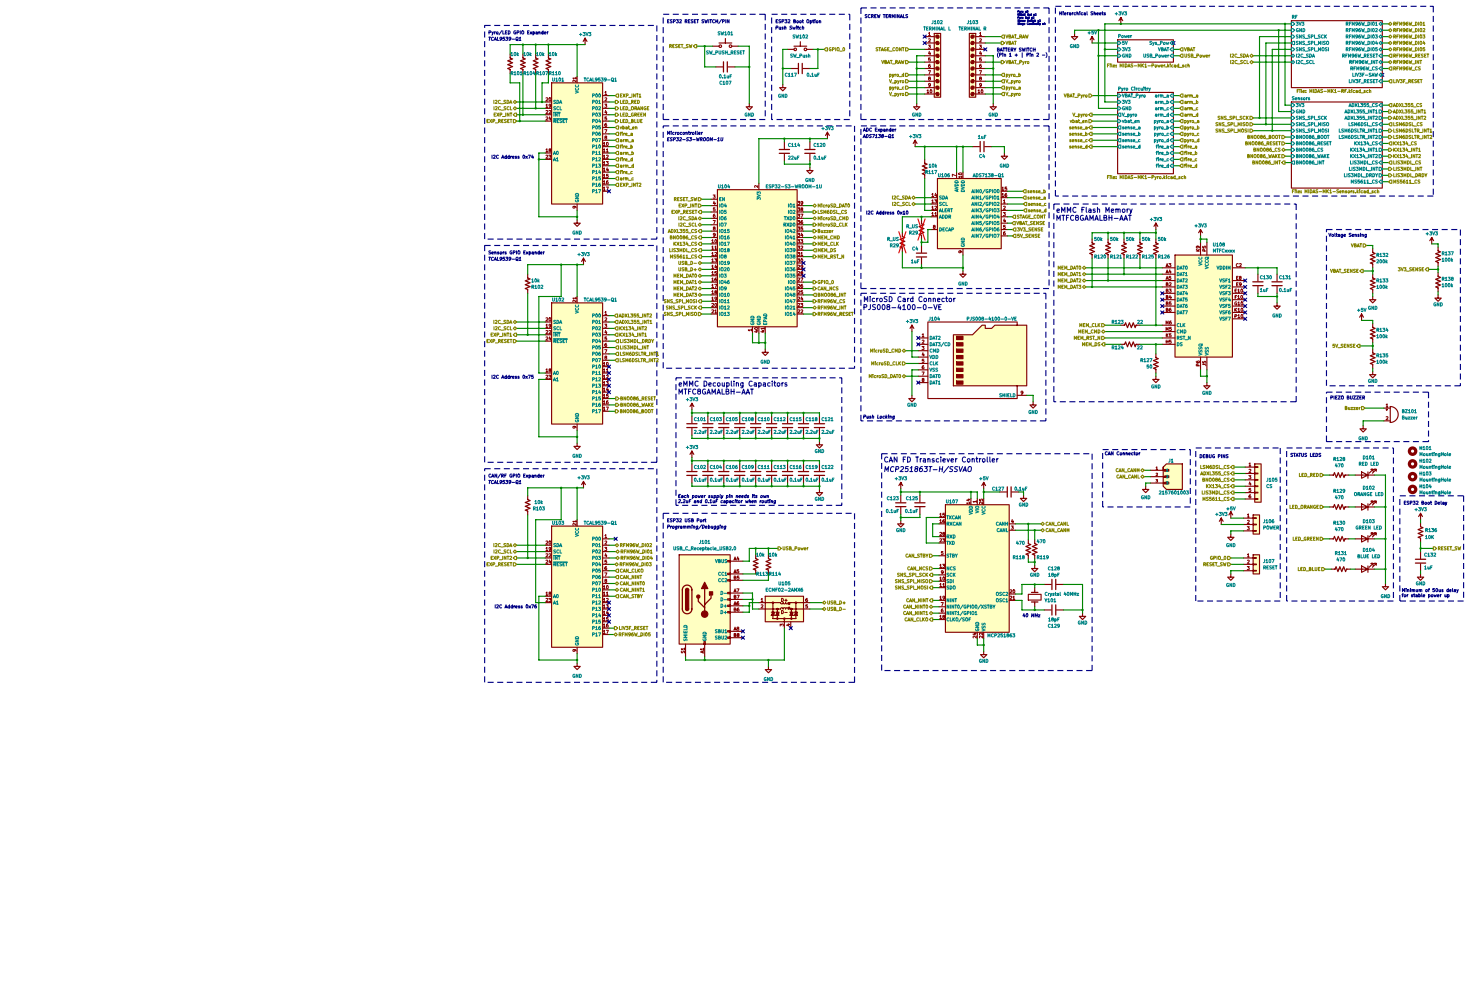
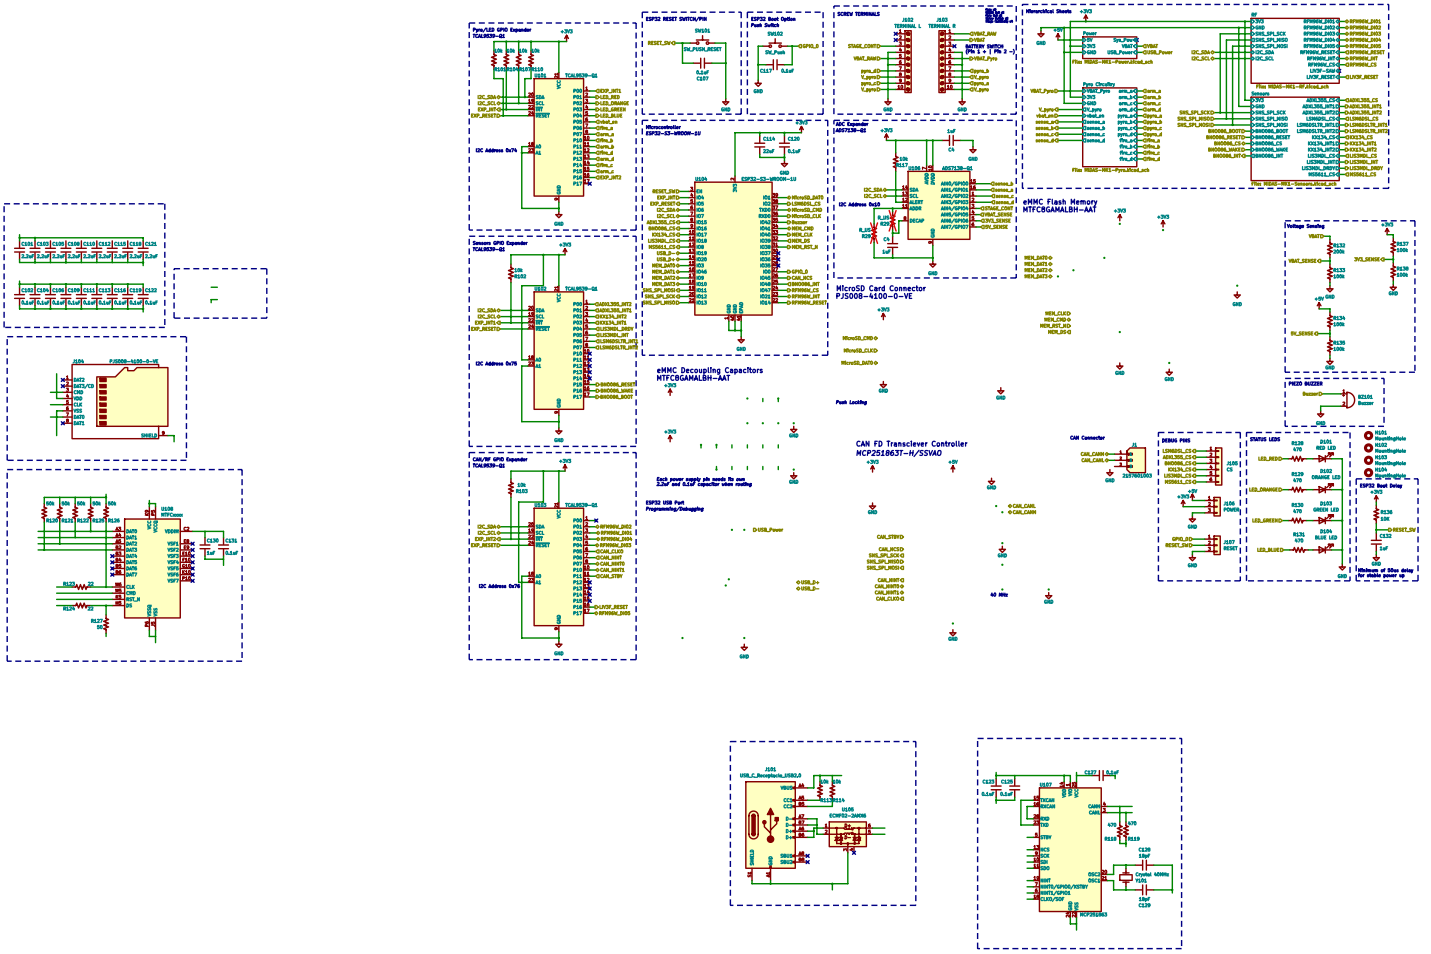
line: (1053, 204) (1296, 204) (1296, 401) (1053, 401) (1053, 204) -> none
line: none -> (4, 203) (164, 203) (164, 327) (4, 327) (4, 203)
wire: (1155, 229) (1155, 239) -> none
wire: (1108, 232) (1108, 239) -> none
wire: (1123, 232) (1123, 239) -> none
wire: (1139, 232) (1139, 239) -> none
wire: (1155, 232) (1092, 232) (1092, 239) -> none
wire: (1200, 235) (1200, 242) -> none
wire: (1200, 239) (1206, 239) (1206, 242) -> none
wire: none -> (19, 234) (19, 240)
wire: none -> (19, 237) (143, 237) (143, 240)
wire: none -> (35, 237) (35, 240)
part position: (1092, 248) -> (44, 512)
part position: (1108, 248) -> (59, 512)
part position: (1123, 248) -> (75, 512)
part position: (1139, 248) -> (90, 512)
part position: (1155, 248) -> (106, 512)
wire: (1092, 258) (1092, 286) -> none
wire: (1108, 258) (1108, 280) -> none
wire: (1123, 258) (1123, 274) -> none
wire: (1139, 258) (1139, 267) -> none
wire: (1155, 258) (1155, 325) -> none
wire: (1085, 267) (1162, 267) -> none
wire: (1245, 267) (1277, 267) (1277, 274) -> none
wire: (1257, 267) (1257, 274) -> none
wire: none -> (19, 259) (19, 262) (143, 262)
wire: none -> (35, 259) (35, 262)
wire: none -> (50, 259) (50, 262)
wire: none -> (65, 259) (65, 262)
wire: none -> (81, 259) (81, 262)
wire: none -> (96, 259) (96, 262)
wire: none -> (112, 259) (112, 262)
wire: none -> (127, 259) (127, 262)
wire: none -> (143, 259) (143, 265)
wire: (1085, 274) (1162, 274) -> none
line: none -> (174, 268) (266, 268) (266, 318) (174, 318) (174, 268)
wire: (1085, 280) (1162, 280) -> none
no-connect mark: (1245, 280) -> none
part position: (1257, 283) -> (204, 546)
part position: (1277, 283) -> (223, 546)
wire: (1085, 286) (1162, 286) -> none
no-connect mark: (1245, 286) -> none
wire: none -> (19, 281) (19, 287)
line: (860, 293) (1045, 293) (1045, 420) (860, 420) (860, 293) -> none
no-connect mark: (1162, 293) -> none
no-connect mark: (1245, 293) -> none
wire: (1257, 293) (1257, 296) (1277, 296) -> none
wire: (1277, 293) (1277, 302) -> none
wire: none -> (19, 284) (143, 284) (143, 287)
wire: none -> (35, 284) (35, 287)
wire: none -> (50, 284) (50, 287)
wire: none -> (65, 284) (65, 287)
wire: none -> (81, 284) (81, 287)
wire: none -> (96, 284) (96, 287)
wire: none -> (112, 284) (112, 287)
wire: none -> (127, 284) (127, 287)
wire: none -> (211, 287) (217, 287)
no-connect mark: (1162, 299) -> none
no-connect mark: (1245, 299) -> none
no-connect mark: (1162, 306) -> none
part position: (1203, 306) -> (152, 568)
no-connect mark: (1245, 306) -> none
wire: none -> (217, 299) (211, 299) (211, 302)
no-connect mark: (1162, 312) -> none
no-connect mark: (1245, 312) -> none
wire: none -> (19, 305) (19, 308) (143, 308)
wire: none -> (35, 305) (35, 308)
wire: none -> (50, 305) (50, 308)
wire: none -> (65, 305) (65, 308)
wire: none -> (81, 305) (81, 308)
wire: none -> (96, 305) (96, 308)
wire: none -> (112, 305) (112, 308)
wire: none -> (127, 305) (127, 308)
wire: none -> (143, 305) (143, 311)
no-connect mark: (1245, 318) -> none
wire: (1104, 325) (1120, 325) -> none
part position: (1130, 325) -> (81, 587)
wire: (1139, 325) (1162, 325) -> none
wire: (911, 331) (911, 357) (918, 357) -> none
wire: (1104, 331) (1162, 331) -> none
no-connect mark: (918, 337) -> none
wire: (1104, 337) (1162, 337) -> none
no-connect mark: (918, 344) -> none
wire: (1104, 344) (1120, 344) -> none
part position: (1130, 344) -> (81, 605)
wire: (1139, 344) (1162, 344) -> none
wire: (1155, 344) (1155, 353) -> none
line: none -> (7, 336) (186, 336) (186, 460) (7, 460) (7, 336)
wire: (905, 350) (918, 350) -> none
part position: (972, 360) -> (115, 401)
wire: (905, 363) (918, 363) -> none
part position: (1155, 363) -> (106, 624)
wire: (918, 369) (911, 369) (911, 395) -> none
wire: (1200, 369) (1200, 376) (1206, 376) -> none
wire: (1206, 369) (1206, 382) -> none
wire: (1155, 373) (1155, 376) -> none
wire: (905, 376) (918, 376) -> none
line: (675, 377) (841, 377) (841, 505) (675, 505) (675, 377) -> none
no-connect mark: (918, 382) -> none
wire: none -> (56, 373) (56, 398) (62, 398)
no-connect mark: none -> (62, 379)
wire: (1026, 395) (1033, 395) (1033, 401) -> none
no-connect mark: none -> (62, 386)
wire: none -> (50, 392) (62, 392)
wire: (691, 409) (691, 416) -> none
wire: (691, 412) (819, 412) (819, 416) -> none
wire: (707, 412) (707, 416) -> none
wire: (723, 412) (723, 416) -> none
wire: (739, 412) (739, 416) -> none
wire: (755, 412) (755, 416) -> none
wire: (771, 412) (771, 416) -> none
wire: none -> (50, 404) (62, 404)
wire: none -> (62, 410) (56, 410) (56, 435)
part position: (691, 425) -> (19, 250)
part position: (707, 425) -> (35, 250)
part position: (723, 425) -> (50, 250)
part position: (739, 425) -> (65, 250)
part position: (755, 425) -> (81, 250)
part position: (771, 425) -> (96, 250)
part position: (787, 425) -> (112, 250)
part position: (803, 425) -> (127, 250)
part position: (819, 425) -> (143, 250)
wire: none -> (50, 417) (62, 417)
wire: (691, 435) (691, 438) (819, 438) -> none
wire: (707, 435) (707, 438) -> none
wire: (723, 435) (723, 438) -> none
wire: (739, 435) (739, 438) -> none
wire: (755, 435) (755, 438) -> none
wire: (771, 435) (771, 438) -> none
wire: (787, 435) (787, 438) -> none
wire: (803, 435) (803, 438) -> none
wire: (819, 435) (819, 441) -> none
no-connect mark: none -> (62, 423)
line: (1102, 449) (1190, 449) (1190, 506) (1102, 506) (1102, 449) -> none
wire: none -> (167, 435) (174, 435) (174, 441)
line: (881, 453) (1092, 453) (1092, 670) (881, 670) (881, 453) -> none
wire: (691, 457) (691, 463) -> none
wire: (691, 460) (819, 460) (819, 463) -> none
wire: (707, 460) (707, 463) -> none
part position: (691, 473) -> (19, 296)
part position: (707, 473) -> (35, 296)
part position: (723, 473) -> (50, 296)
part position: (739, 473) -> (65, 296)
part position: (755, 473) -> (81, 296)
part position: (771, 473) -> (96, 296)
part position: (787, 473) -> (112, 296)
part position: (803, 473) -> (127, 296)
part position: (819, 473) -> (143, 296)
wire: (691, 483) (691, 486) (819, 486) -> none
wire: (707, 483) (707, 486) -> none
wire: (723, 483) (723, 486) -> none
wire: (819, 483) (819, 489) -> none
wire: (1150, 483) (1145, 483) (1145, 486) -> none
line: none -> (7, 469) (7, 661) (242, 661) (242, 469) (7, 469)
wire: (900, 488) (900, 495) -> none
wire: (983, 488) (983, 498) -> none
wire: (900, 491) (977, 491) (977, 498) -> none
wire: (919, 491) (919, 495) -> none
wire: (970, 491) (970, 498) -> none
wire: (983, 491) (999, 491) -> none
part position: (1009, 491) -> (1101, 775)
wire: (1018, 491) (1023, 491) (1023, 495) -> none
part position: (900, 504) -> (996, 787)
part position: (919, 504) -> (1014, 787)
wire: none -> (106, 494) (106, 503)
line: (663, 513) (854, 513) (854, 682) (663, 682) (663, 513) -> none
wire: none -> (59, 497) (59, 503)
wire: none -> (75, 497) (75, 503)
wire: none -> (90, 497) (90, 503)
wire: none -> (106, 497) (44, 497) (44, 503)
wire: (900, 514) (900, 520) -> none
wire: (919, 514) (919, 517) (900, 517) -> none
wire: (939, 517) (926, 517) (926, 542) (939, 542) -> none
wire: none -> (149, 500) (149, 506)
wire: none -> (149, 503) (155, 503) (155, 506)
wire: (939, 523) (932, 523) (932, 536) (939, 536) -> none
wire: (1015, 523) (1041, 523) -> none
wire: (1028, 523) (1028, 539) -> none
wire: (1015, 530) (1041, 530) -> none
wire: (1034, 530) (1034, 539) -> none
wire: none -> (44, 522) (44, 549)
wire: none -> (59, 522) (59, 543)
wire: none -> (75, 522) (75, 537)
wire: none -> (90, 522) (90, 531)
wire: none -> (106, 522) (106, 587)
wire: (755, 548) (755, 554) -> none
wire: (768, 548) (768, 554) -> none
wire: (778, 548) (749, 548) (749, 561) (742, 561) -> none
part position: (1028, 549) -> (1119, 831)
part position: (1034, 549) -> (1125, 831)
wire: none -> (38, 531) (112, 531)
wire: none -> (192, 531) (223, 531) (223, 537)
wire: none -> (204, 531) (204, 537)
wire: (932, 555) (939, 555) -> none
wire: none -> (38, 537) (112, 537)
wire: (1028, 558) (1028, 562) (1034, 562) -> none
wire: (1034, 558) (1034, 565) -> none
wire: none -> (38, 543) (112, 543)
no-connect mark: none -> (192, 543)
part position: (755, 564) -> (820, 790)
part position: (768, 564) -> (832, 790)
wire: (932, 568) (939, 568) -> none
part position: (977, 568) -> (1070, 849)
wire: none -> (38, 549) (112, 549)
no-connect mark: none -> (192, 549)
wire: (742, 573) (755, 573) -> none
wire: (768, 573) (768, 580) (742, 580) -> none
wire: (932, 574) (939, 574) -> none
no-connect mark: none -> (112, 556)
no-connect mark: none -> (192, 556)
wire: none -> (204, 556) (204, 559) (223, 559)
wire: none -> (223, 556) (223, 565)
no-connect mark: none -> (112, 562)
no-connect mark: none -> (192, 562)
wire: (932, 581) (939, 581) -> none
wire: (1034, 584) (1034, 587) -> none
wire: (1044, 584) (1021, 584) (1021, 594) (1015, 594) -> none
part position: (1053, 584) -> (1144, 865)
wire: (1063, 584) (1082, 584) (1082, 613) -> none
wire: (932, 587) (939, 587) -> none
no-connect mark: none -> (112, 568)
no-connect mark: none -> (192, 568)
wire: (742, 593) (752, 593) (752, 609) (758, 609) -> none
no-connect mark: none -> (112, 574)
no-connect mark: none -> (192, 574)
part position: (1034, 597) -> (1125, 877)
wire: (742, 599) (752, 599) -> none
wire: (932, 600) (939, 600) -> none
wire: (1015, 600) (1021, 600) (1021, 609) (1044, 609) -> none
no-connect mark: none -> (192, 580)
wire: (758, 602) (749, 602) (749, 612) (742, 612) -> none
wire: (809, 602) (822, 602) -> none
part position: (710, 605) -> (776, 831)
wire: (742, 605) (749, 605) -> none
wire: (932, 606) (939, 606) -> none
wire: (1034, 606) (1034, 609) -> none
wire: none -> (56, 587) (72, 587)
wire: none -> (90, 587) (112, 587)
wire: (809, 609) (822, 609) -> none
part position: (1053, 609) -> (1144, 889)
wire: (1063, 609) (1082, 609) -> none
part position: (784, 612) -> (847, 837)
wire: none -> (56, 593) (112, 593)
wire: (932, 613) (939, 613) -> none
wire: (932, 619) (939, 619) -> none
wire: none -> (56, 599) (112, 599)
wire: none -> (56, 605) (72, 605)
wire: none -> (90, 605) (112, 605)
wire: none -> (106, 605) (106, 614)
wire: (784, 628) (784, 660) (685, 660) (685, 656) -> none
no-connect mark: (790, 628) -> none
no-connect mark: (742, 631) -> none
no-connect mark: (742, 637) -> none
wire: (977, 638) (977, 645) (983, 645) -> none
wire: (983, 638) (983, 651) -> none
wire: none -> (149, 630) (149, 636) (155, 636)
wire: none -> (155, 630) (155, 642)
wire: none -> (106, 633) (106, 636)
wire: (704, 656) (704, 660) -> none
wire: (768, 660) (768, 666) -> none
line: none -> (977, 738) (1181, 738) (1181, 948) (977, 948) (977, 738)
line: none -> (730, 741) (915, 741) (915, 905) (730, 905) (730, 741)
wire: none -> (996, 772) (996, 778)
wire: none -> (1076, 772) (1076, 781)
wire: none -> (820, 775) (820, 781)
wire: none -> (832, 775) (832, 781)
wire: none -> (841, 775) (813, 775) (813, 787) (807, 787)
wire: none -> (996, 775) (1070, 775) (1070, 781)
wire: none -> (1014, 775) (1014, 778)
wire: none -> (1064, 775) (1064, 781)
wire: none -> (1076, 775) (1091, 775)
wire: none -> (1110, 775) (1115, 775) (1115, 778)
wire: none -> (996, 797) (996, 803)
wire: none -> (1014, 797) (1014, 800) (996, 800)
wire: none -> (807, 800) (820, 800)
wire: none -> (832, 800) (832, 806) (807, 806)
wire: none -> (1033, 800) (1020, 800) (1020, 824) (1033, 824)
wire: none -> (1033, 806) (1027, 806) (1027, 818) (1033, 818)
wire: none -> (1107, 806) (1132, 806)
wire: none -> (1119, 806) (1119, 821)
wire: none -> (1107, 812) (1132, 812)
wire: none -> (1125, 812) (1125, 821)
wire: none -> (807, 818) (816, 818) (816, 834) (823, 834)
wire: none -> (807, 824) (816, 824)
wire: none -> (823, 828) (813, 828) (813, 837) (807, 837)
wire: none -> (872, 828) (884, 828)
wire: none -> (807, 831) (813, 831)
wire: none -> (872, 834) (884, 834)
wire: none -> (1027, 837) (1033, 837)
wire: none -> (1119, 840) (1119, 843) (1125, 843)
wire: none -> (1125, 840) (1125, 846)
wire: none -> (1027, 849) (1033, 849)
wire: none -> (847, 852) (847, 883) (752, 883) (752, 880)
no-connect mark: none -> (853, 852)
no-connect mark: none -> (807, 855)
wire: none -> (1027, 855) (1033, 855)
no-connect mark: none -> (807, 862)
wire: none -> (1027, 862) (1033, 862)
wire: none -> (1125, 865) (1125, 868)
wire: none -> (1135, 865) (1113, 865) (1113, 874) (1107, 874)
wire: none -> (1153, 865) (1172, 865) (1172, 892)
wire: none -> (1027, 868) (1033, 868)
wire: none -> (770, 880) (770, 883)
wire: none -> (1027, 880) (1033, 880)
wire: none -> (1107, 880) (1113, 880) (1113, 889) (1135, 889)
wire: none -> (832, 883) (832, 889)
wire: none -> (1027, 886) (1033, 886)
wire: none -> (1125, 886) (1125, 889)
wire: none -> (1153, 889) (1172, 889)
wire: none -> (1027, 892) (1033, 892)
wire: none -> (1027, 899) (1033, 899)
wire: none -> (1070, 917) (1070, 923) (1076, 923)
wire: none -> (1076, 917) (1076, 930)

